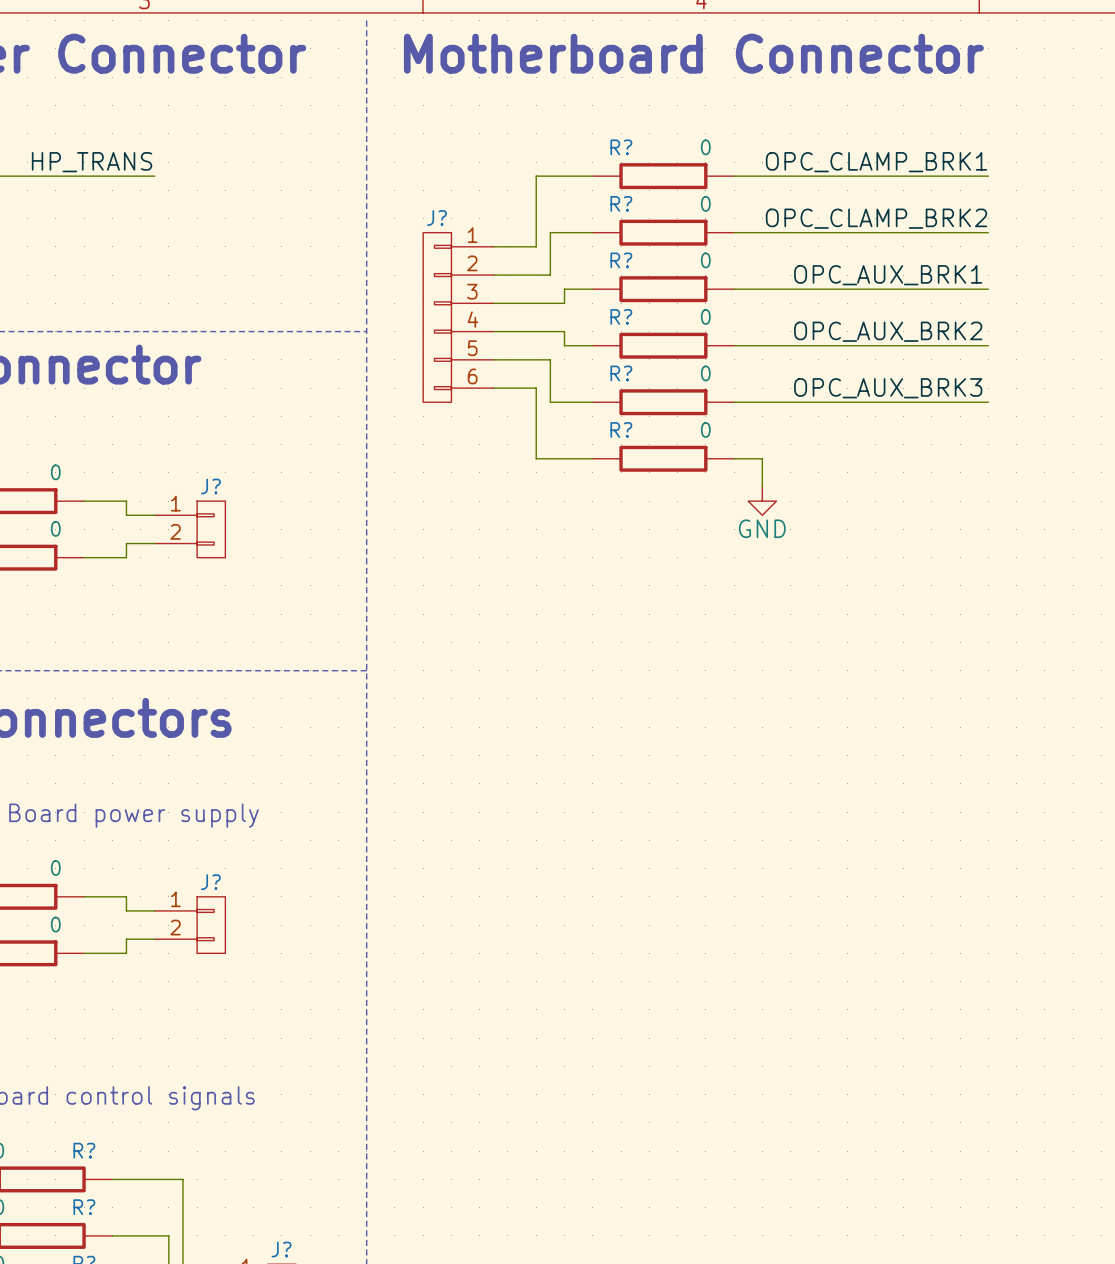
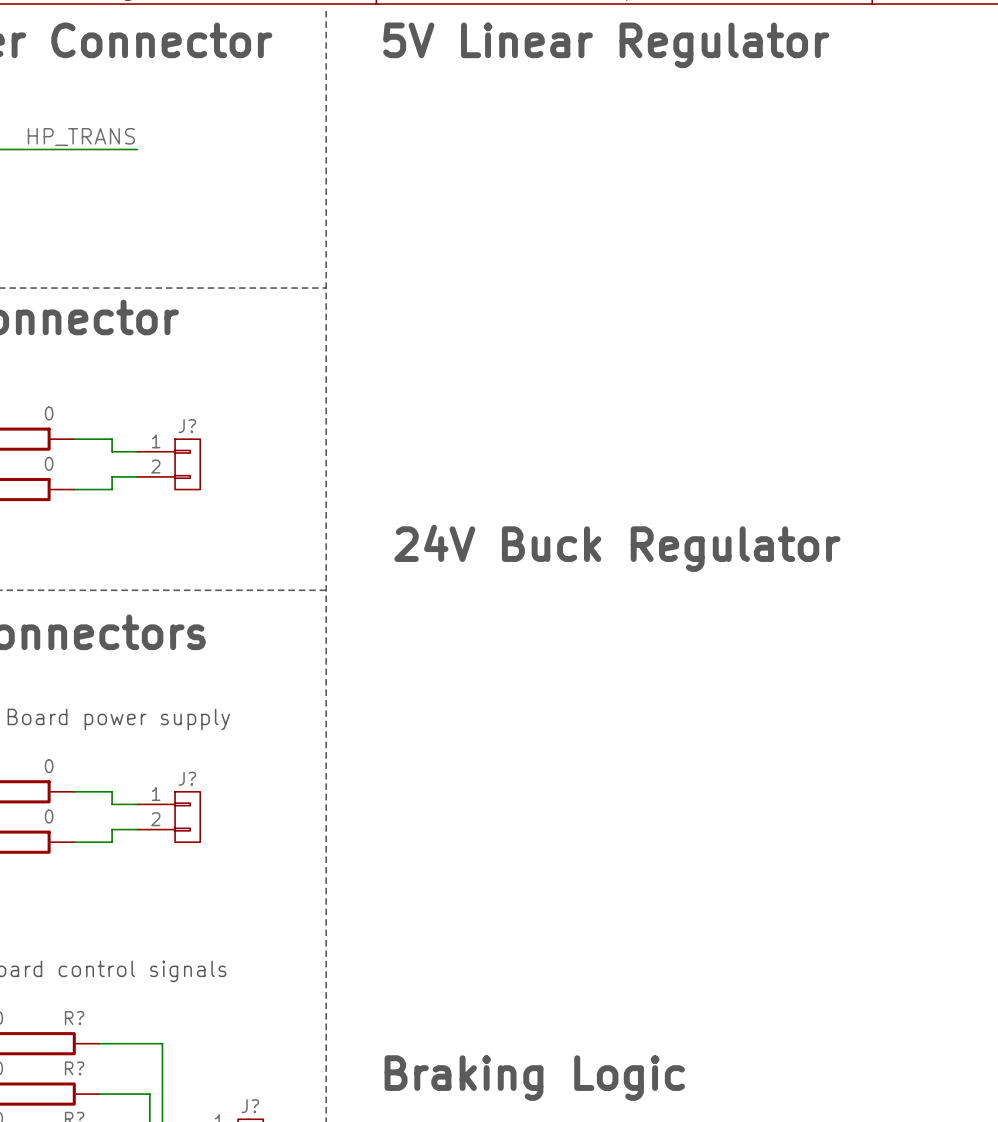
text: Motherboard Connector (693, 53) -> none
text: none -> 5V Linear Regulator (606, 45)
label: OPC_CLAMP_BRK1 (876, 162) -> none
wire: (592, 176) (536, 176) (536, 246) (493, 246) -> none
R?: 0 (663, 176) -> none
wire: (734, 176) (988, 176) -> none
label: OPC_CLAMP_BRK2 (876, 218) -> none
wire: (592, 232) (550, 232) (550, 275) (493, 275) -> none
R?: 0 (663, 232) -> none
wire: (734, 232) (988, 232) -> none
label: OPC_AUX_BRK1 (888, 275) -> none
wire: (592, 289) (564, 289) (564, 303) (493, 303) -> none
R?: 0 (663, 289) -> none
wire: (734, 289) (988, 289) -> none
J?: (458, 317) -> none
wire: (493, 331) (564, 331) (564, 345) (592, 345) -> none
label: OPC_AUX_BRK2 (888, 331) -> none
R?: 0 (663, 345) -> none
wire: (734, 345) (988, 345) -> none
wire: (493, 359) (550, 359) (550, 402) (592, 402) -> none
wire: (493, 388) (536, 388) (536, 458) (592, 458) -> none
label: OPC_AUX_BRK3 (888, 388) -> none
R?: 0 (663, 402) -> none
wire: (734, 402) (988, 402) -> none
R?: 0 (663, 458) -> none
wire: (734, 458) (762, 458) (762, 487) -> none
power symbol: GND (762, 501) -> none
text: none -> 24V Buck Regulator (617, 548)
text: none -> Braking Logic (534, 1078)

